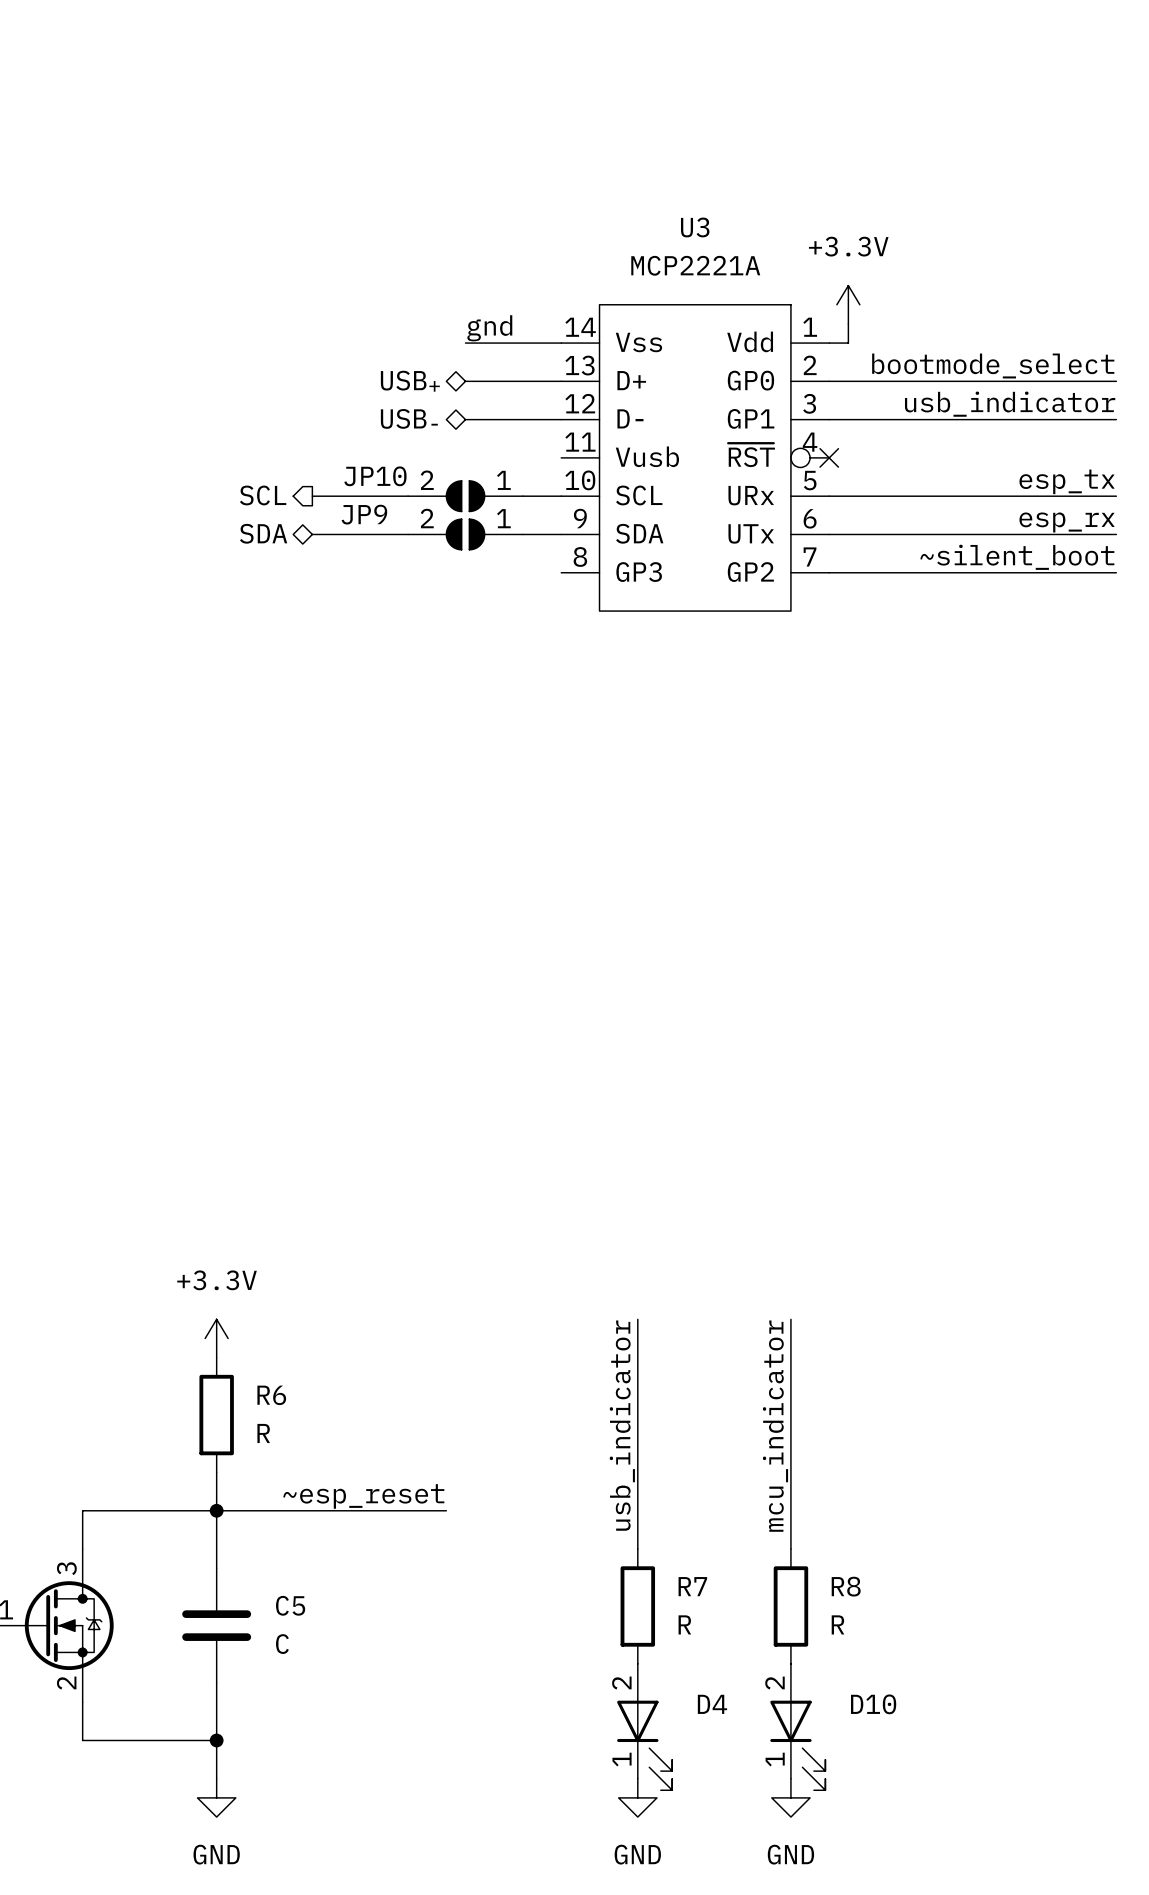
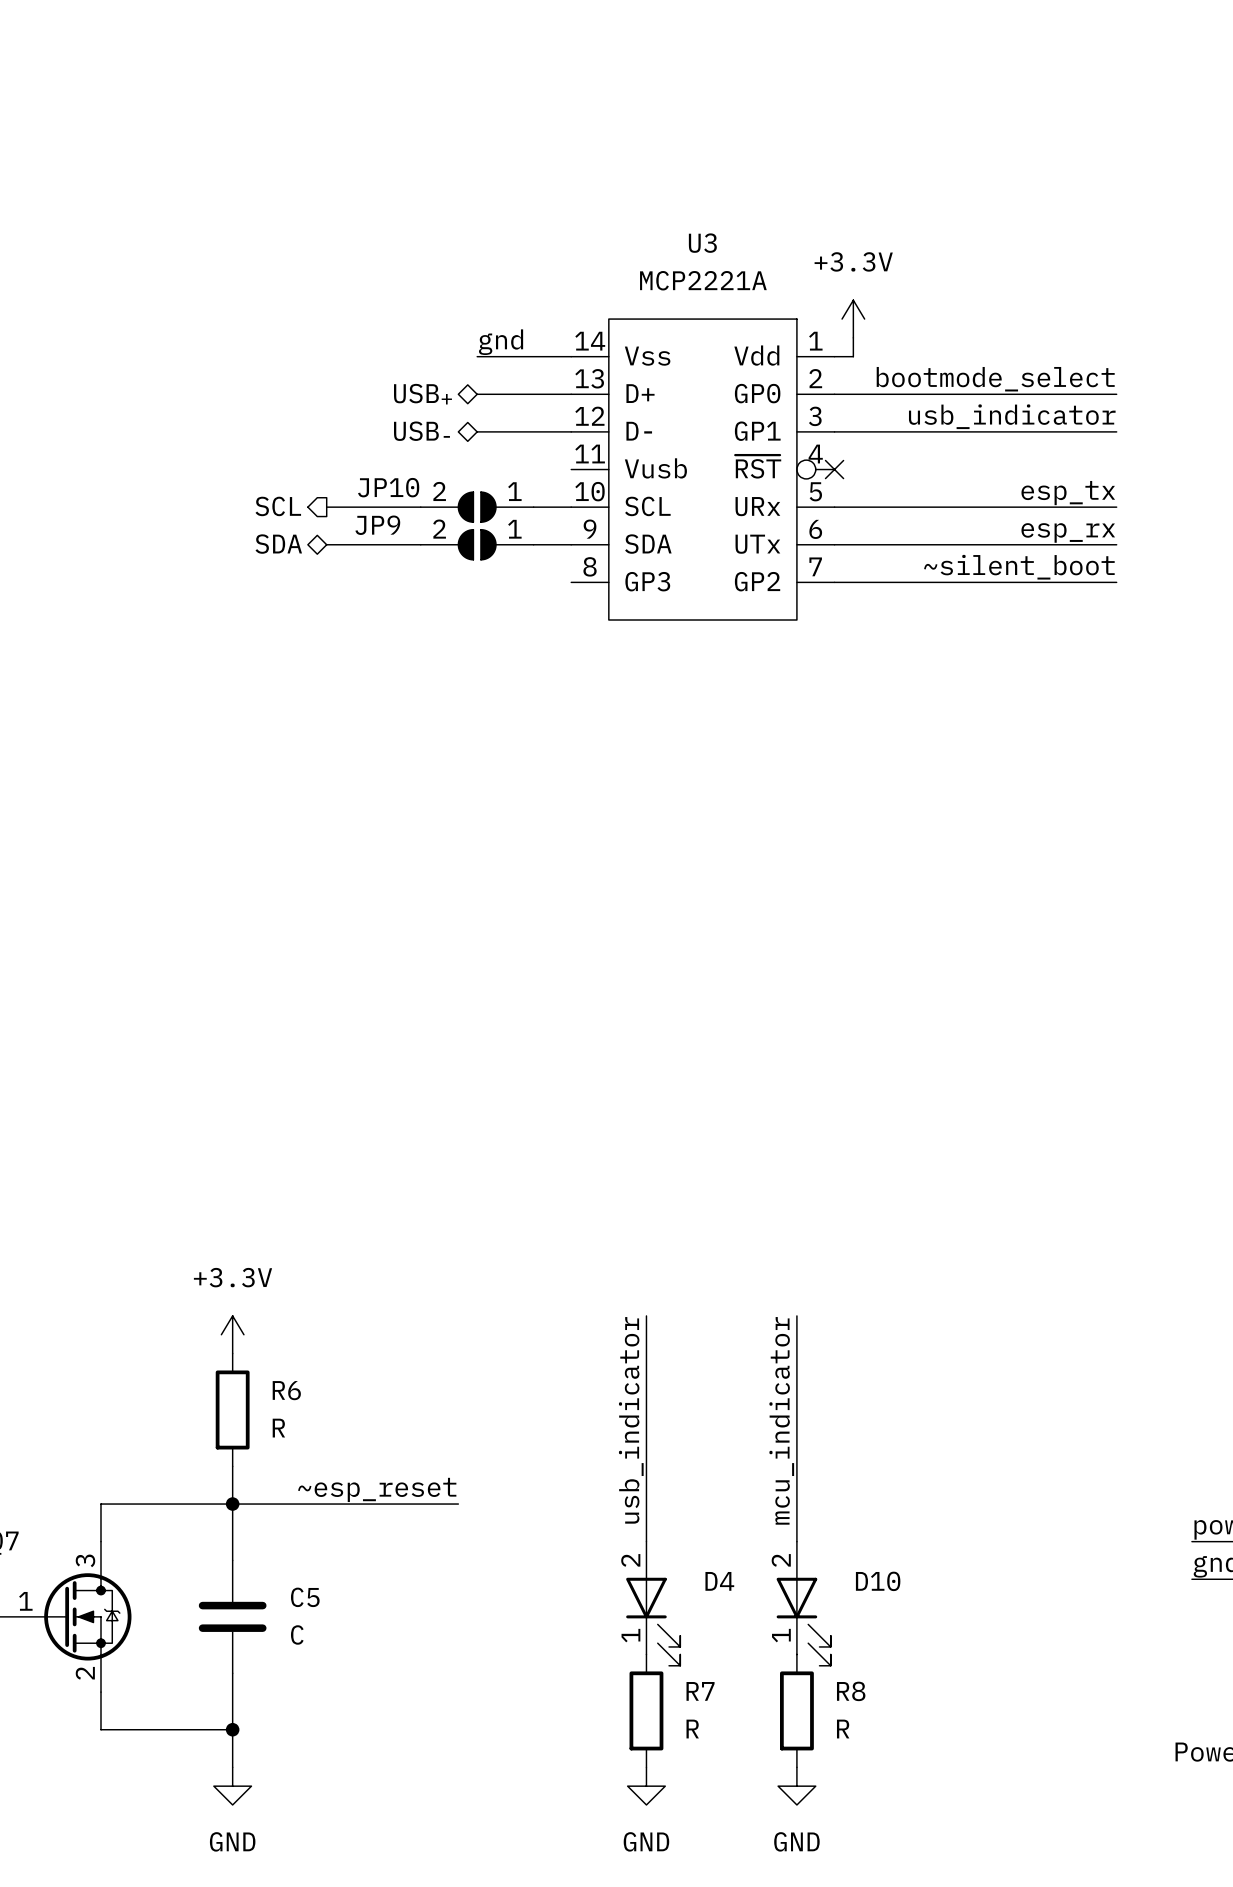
R7 position: (637, 1606) -> (646, 1710)
R8 position: (790, 1606) -> (796, 1710)
D4 position: (644, 1727) -> (653, 1603)
D10 position: (797, 1727) -> (803, 1603)

